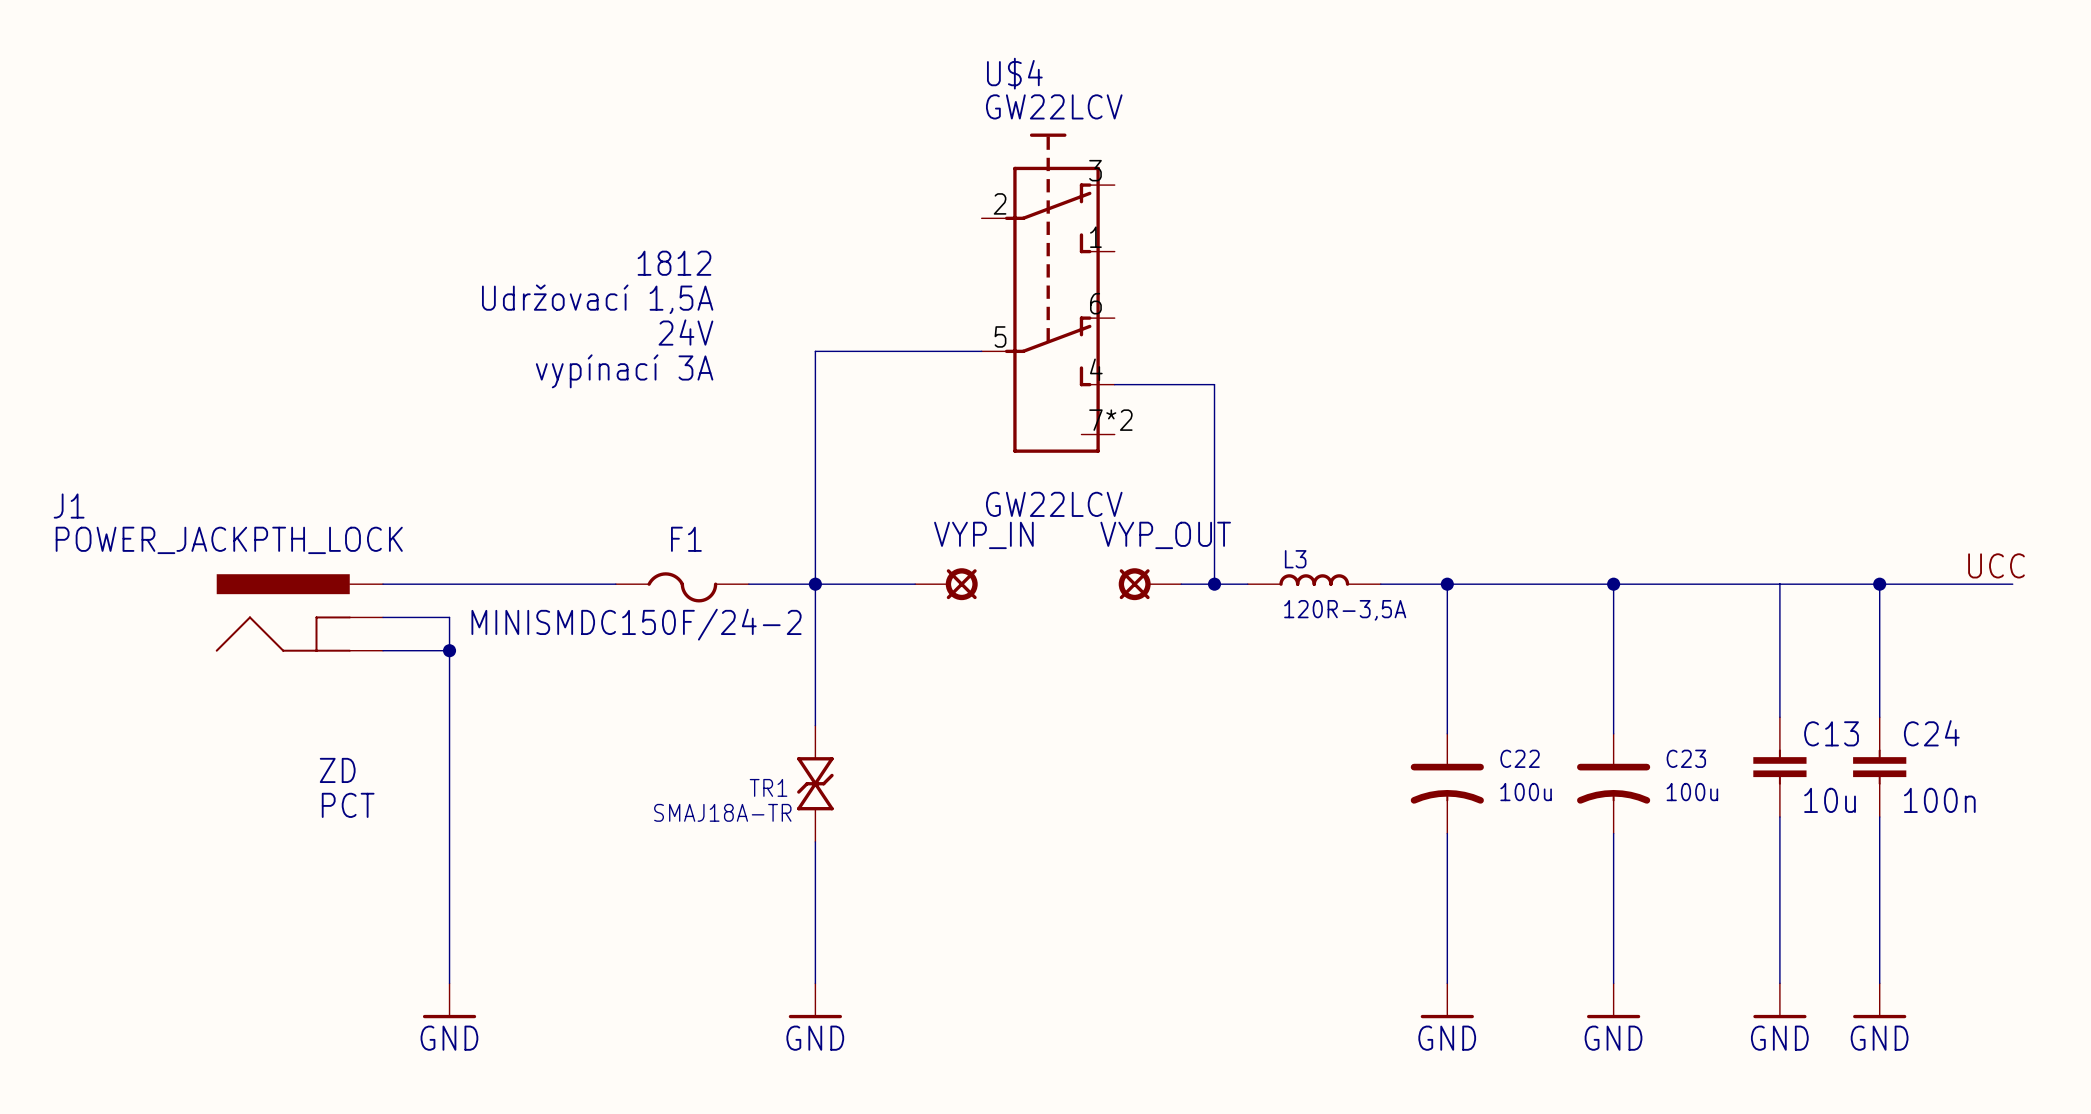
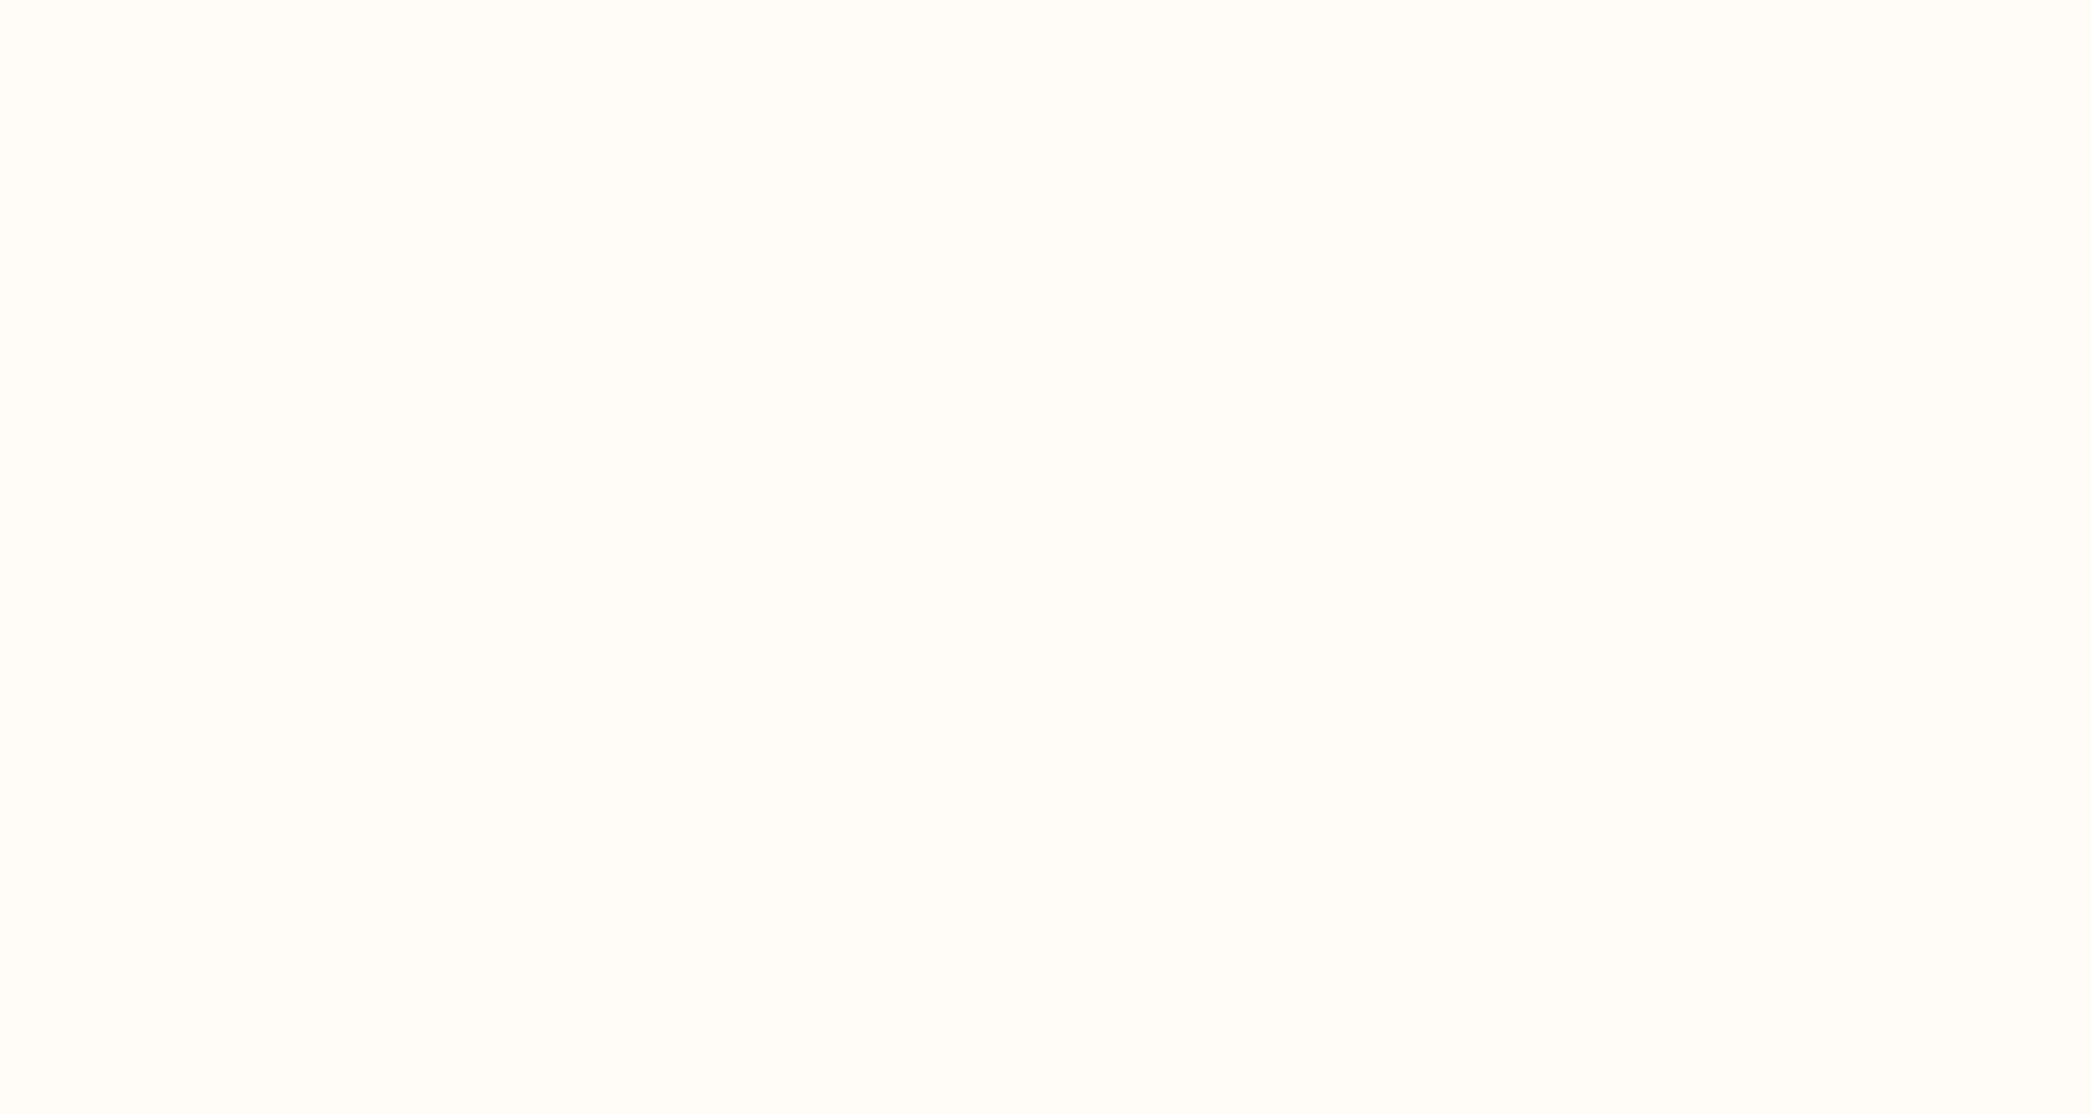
text: 1812 (674, 263) -> none
U$4: GW22LCV (1048, 293) -> none
text: Udržovací 1,5A (597, 299) -> none
text: 24V (685, 332) -> none
wire: (981, 351) (815, 351) (815, 725) -> none
text: vypínací 3A (624, 371) -> none
wire: (1114, 384) (1214, 384) (1214, 584) -> none
text: GW22LCV (1054, 504) -> none
label: UCC (1996, 565) -> none
L3: 120R-3,5A (1314, 580) -> none
wire: (383, 584) (615, 584) -> none
wire: (748, 584) (915, 584) -> none
junction: (815, 584) -> none
VYP_IN: (946, 584) -> none
VYP_OUT: (1149, 584) -> none
wire: (1181, 584) (1247, 584) -> none
junction: (1214, 584) -> none
wire: (1380, 584) (2012, 584) -> none
wire: (1447, 584) (1447, 733) -> none
junction: (1447, 584) -> none
wire: (1613, 584) (1613, 733) -> none
junction: (1613, 584) -> none
wire: (1779, 584) (1779, 717) -> none
wire: (1879, 584) (1879, 717) -> none
junction: (1879, 584) -> none
F1: MINISMDC150F/24-2 (682, 587) -> none
J1: POWER_JACKPTH_LOCK (299, 612) -> none
wire: (383, 617) (449, 617) (449, 983) -> none
wire: (383, 650) (449, 650) -> none
junction: (449, 650) -> none
C13: 10u (1779, 767) -> none
C24: 100n (1879, 767) -> none
text: ZD (337, 770) -> none
TR1: SMAJ18A-TR (815, 783) -> none
C22: 100u (1447, 783) -> none
C23: 100u (1613, 783) -> none
text: PCT (348, 805) -> none
wire: (1779, 817) (1779, 983) -> none
wire: (1879, 817) (1879, 983) -> none
wire: (1447, 833) (1447, 983) -> none
wire: (1613, 833) (1613, 983) -> none
wire: (815, 841) (815, 983) -> none
power symbol: GND (449, 1000) -> none
power symbol: GND (815, 1000) -> none
power symbol: GND (1447, 1000) -> none
power symbol: GND (1613, 1000) -> none
power symbol: GND (1779, 1000) -> none
power symbol: GND (1879, 1000) -> none

